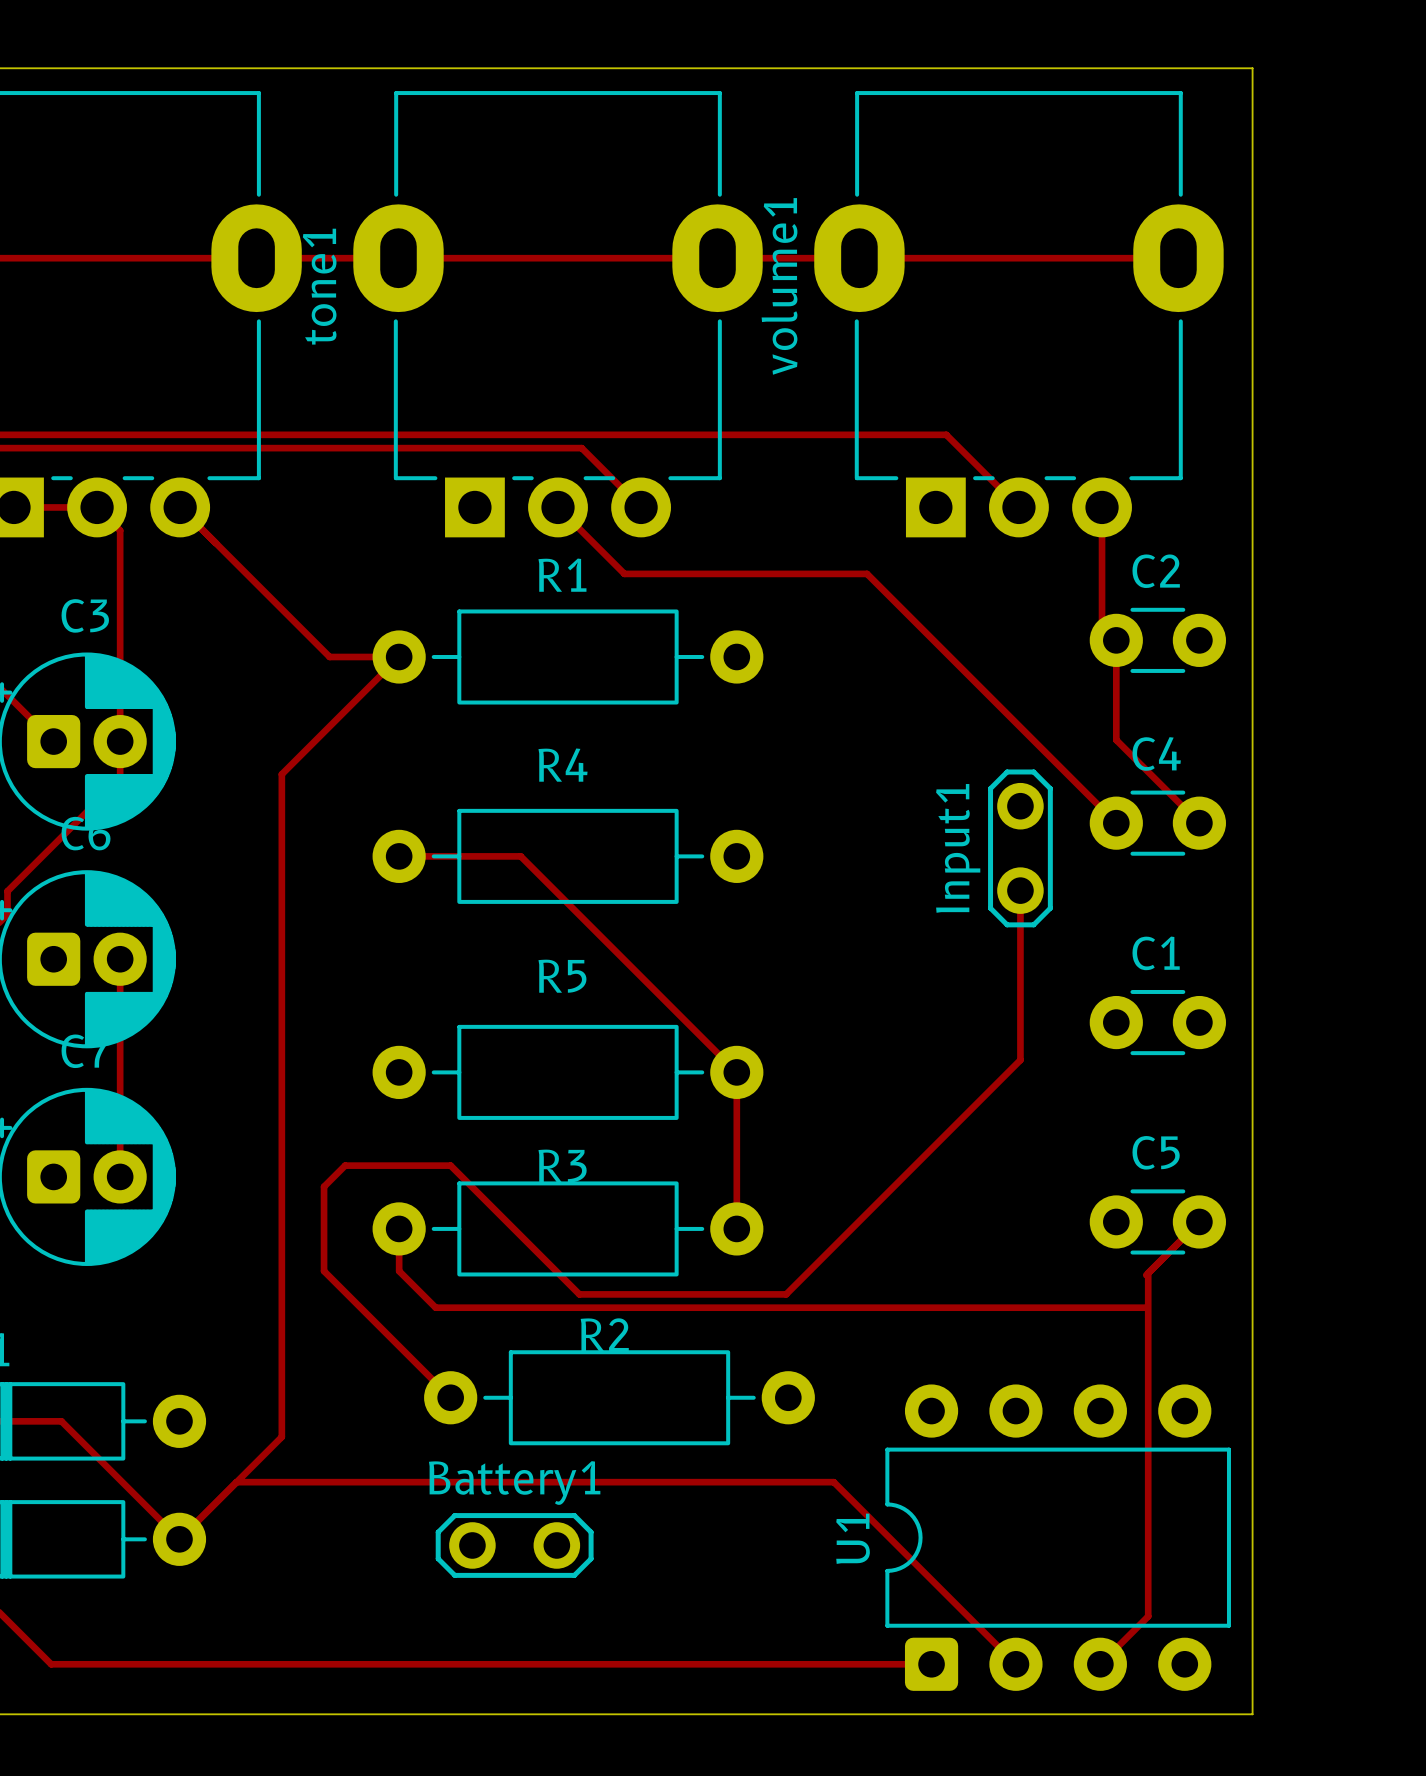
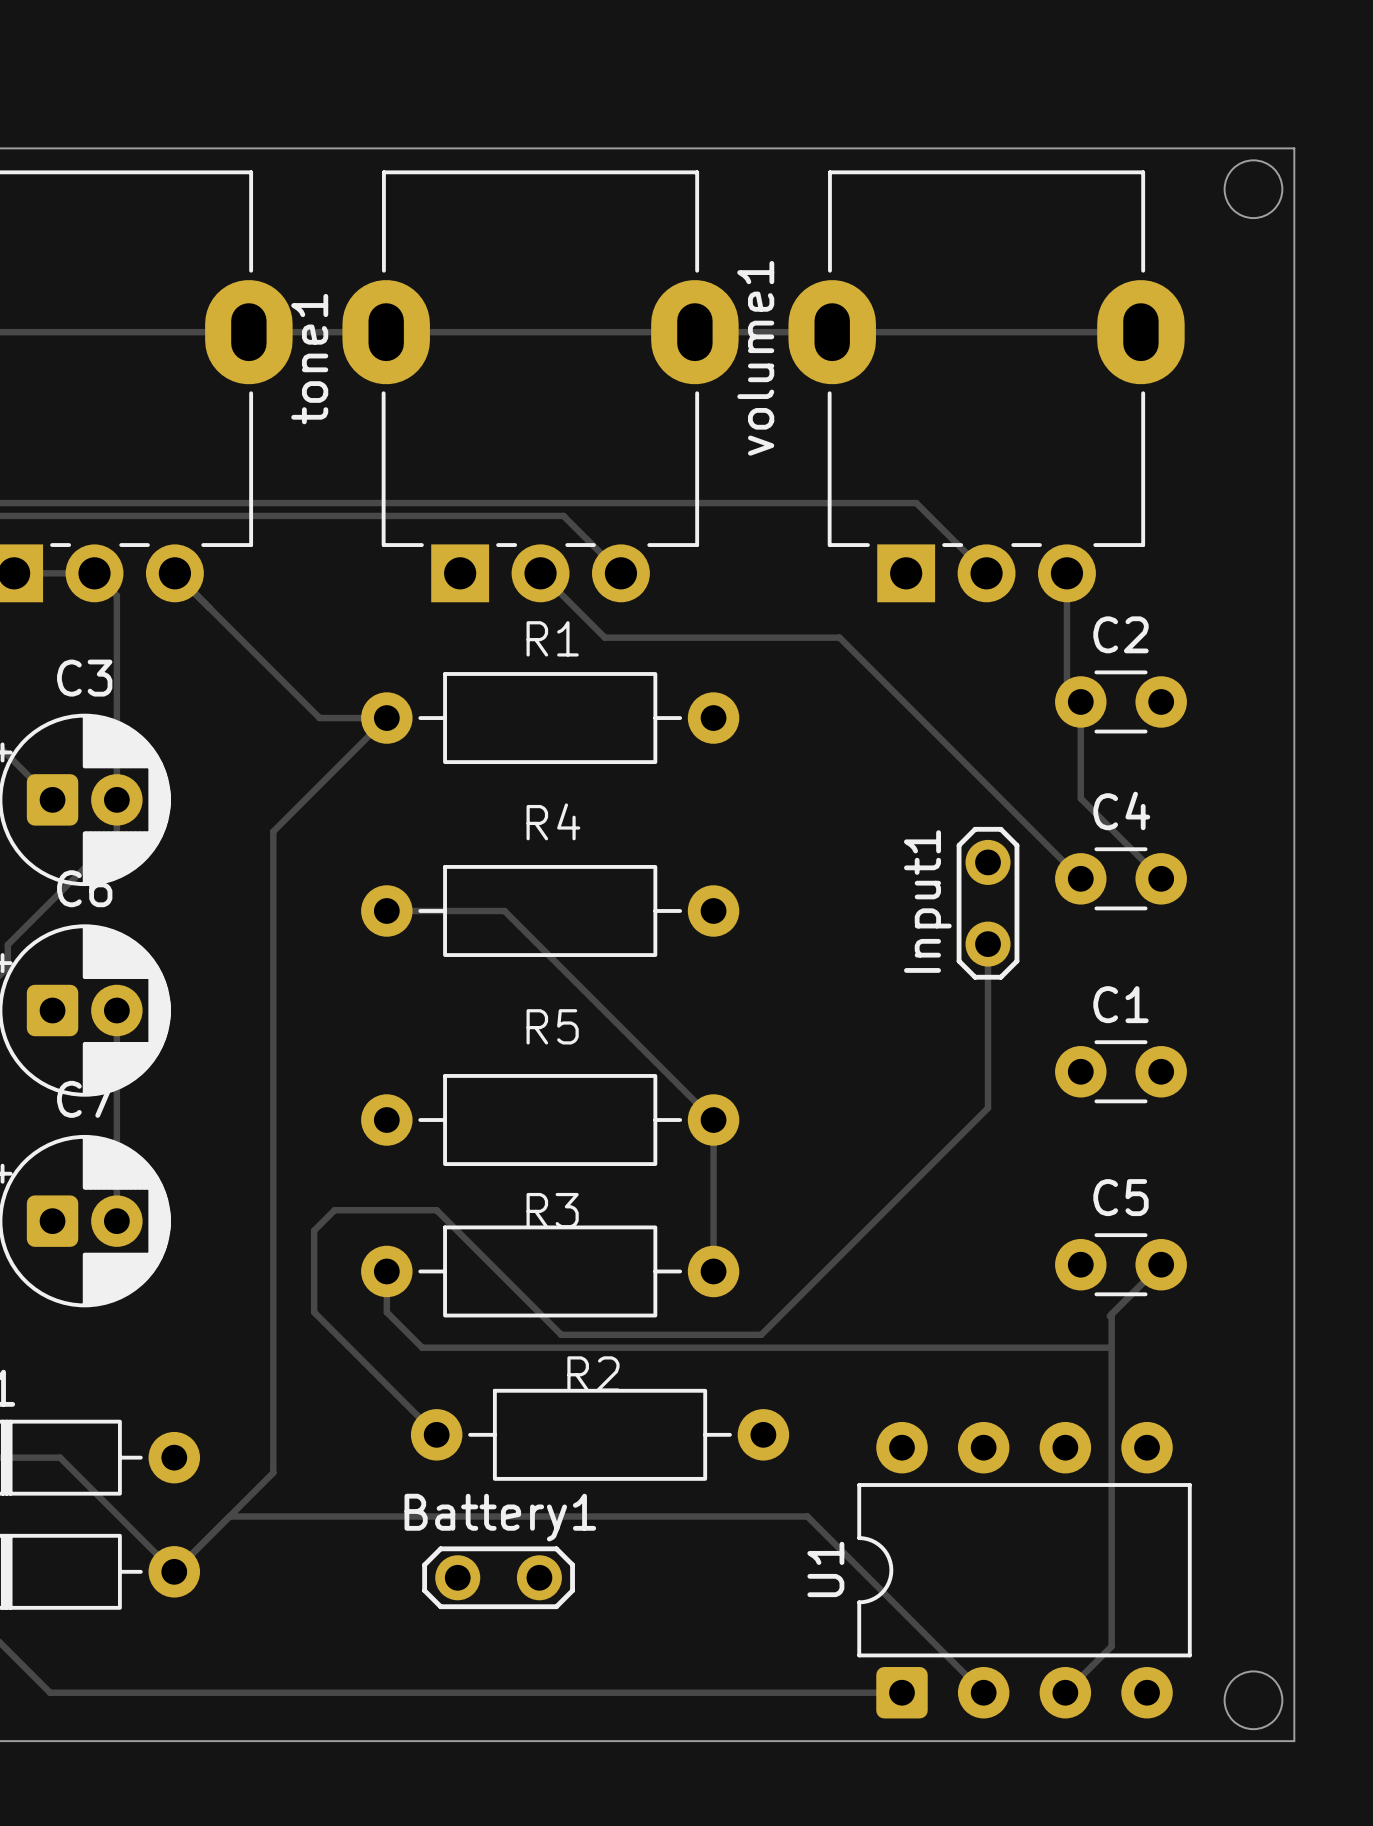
board edge: (1252, 68) (1252, 1714) -> (1212, 148) (1294, 148) (1294, 1741) (1212, 1741)
round board edge: none -> [1223, 159, 1284, 219]
round board edge: none -> [1223, 1670, 1284, 1730]

